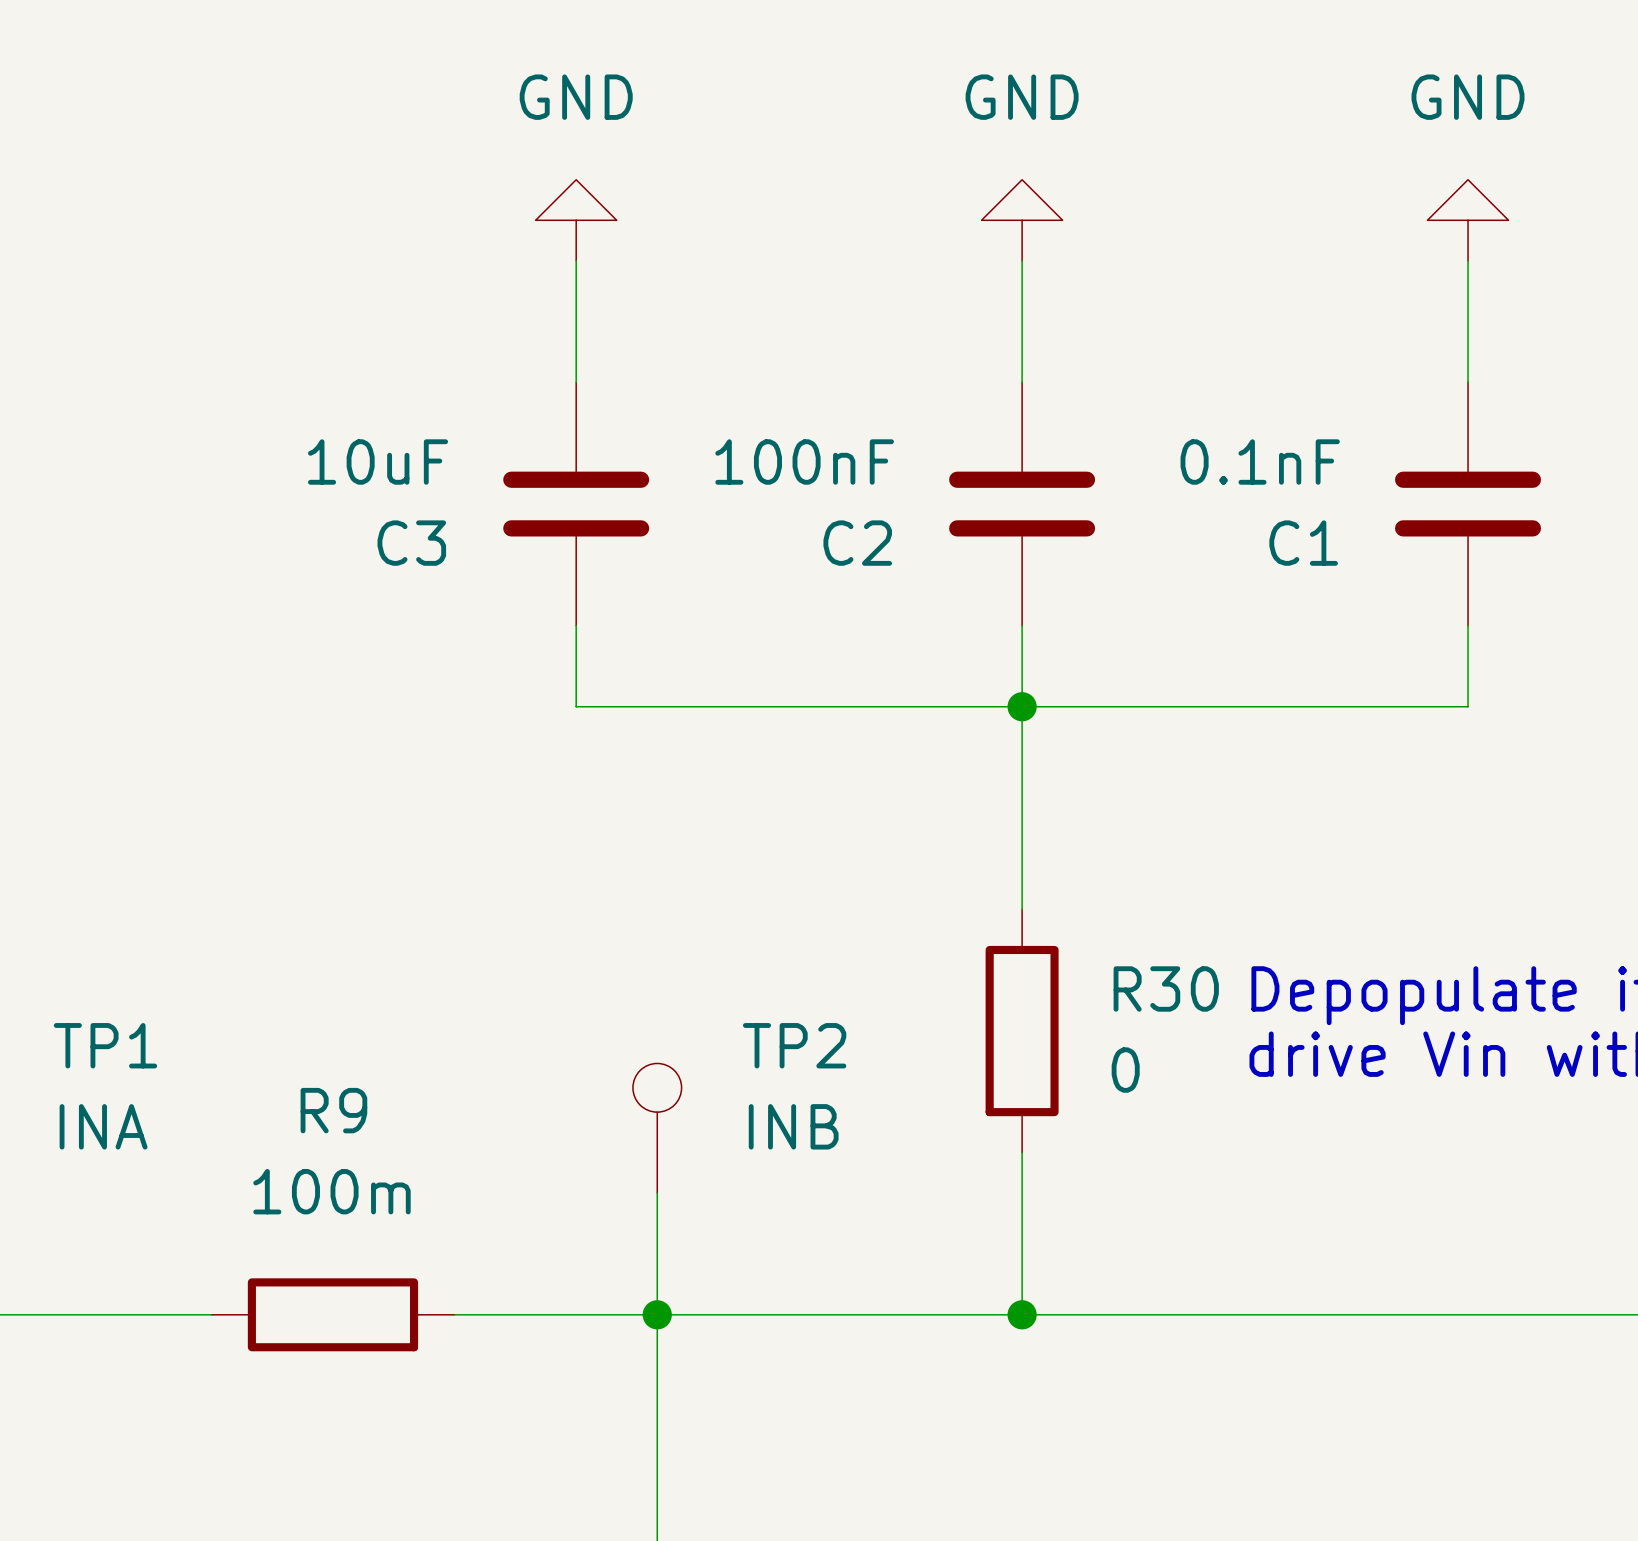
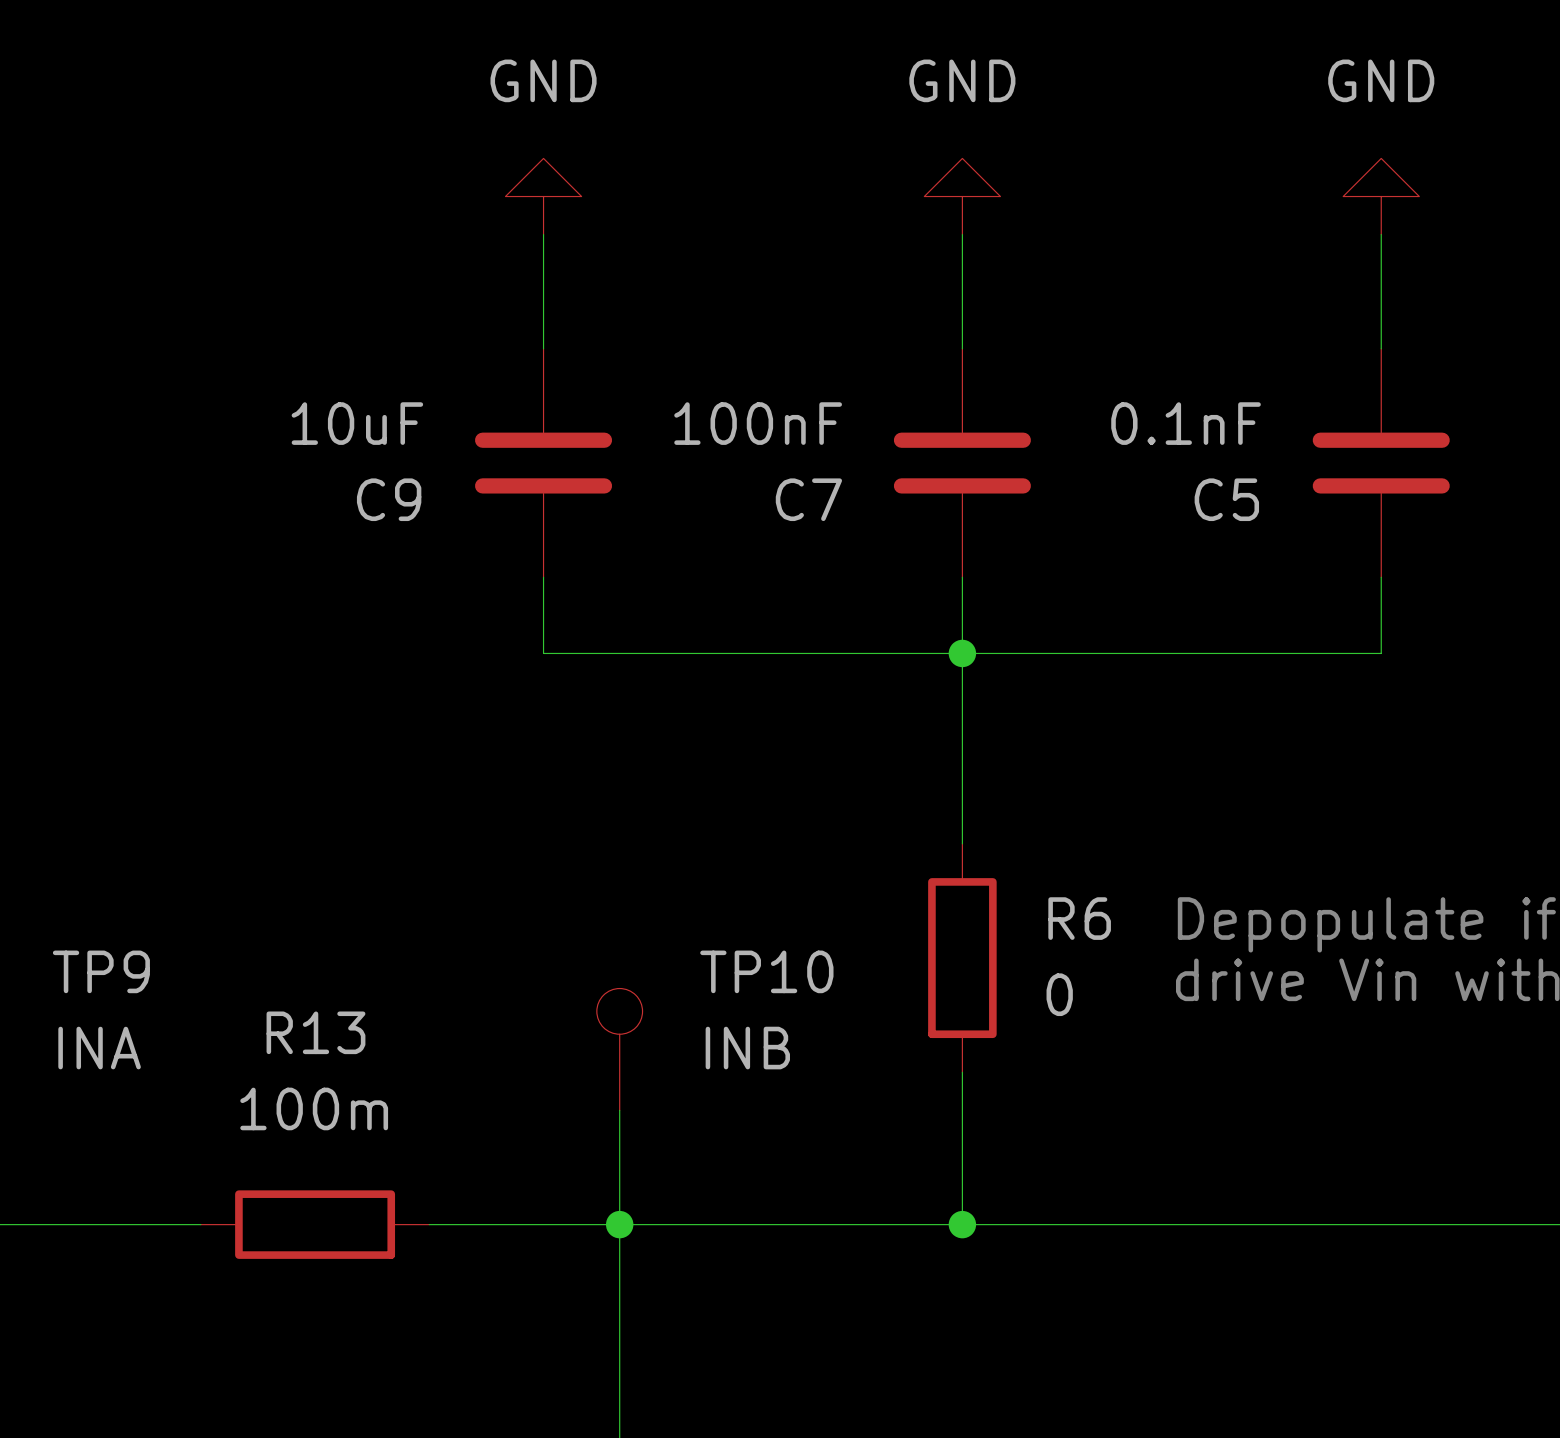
C3 name: C3 (411, 543) -> C9 (389, 499)
C2 name: C2 (857, 543) -> C7 (808, 499)
C1 name: C1 (1303, 543) -> C5 (1226, 499)
R30 name: R30 (1166, 988) -> R6 (1079, 918)
TP1 name: TP1 (105, 1045) -> TP9 (101, 971)
TP2 name: TP2 (794, 1045) -> TP10 (766, 971)
R9 name: R9 (333, 1110) -> R13 (315, 1032)

